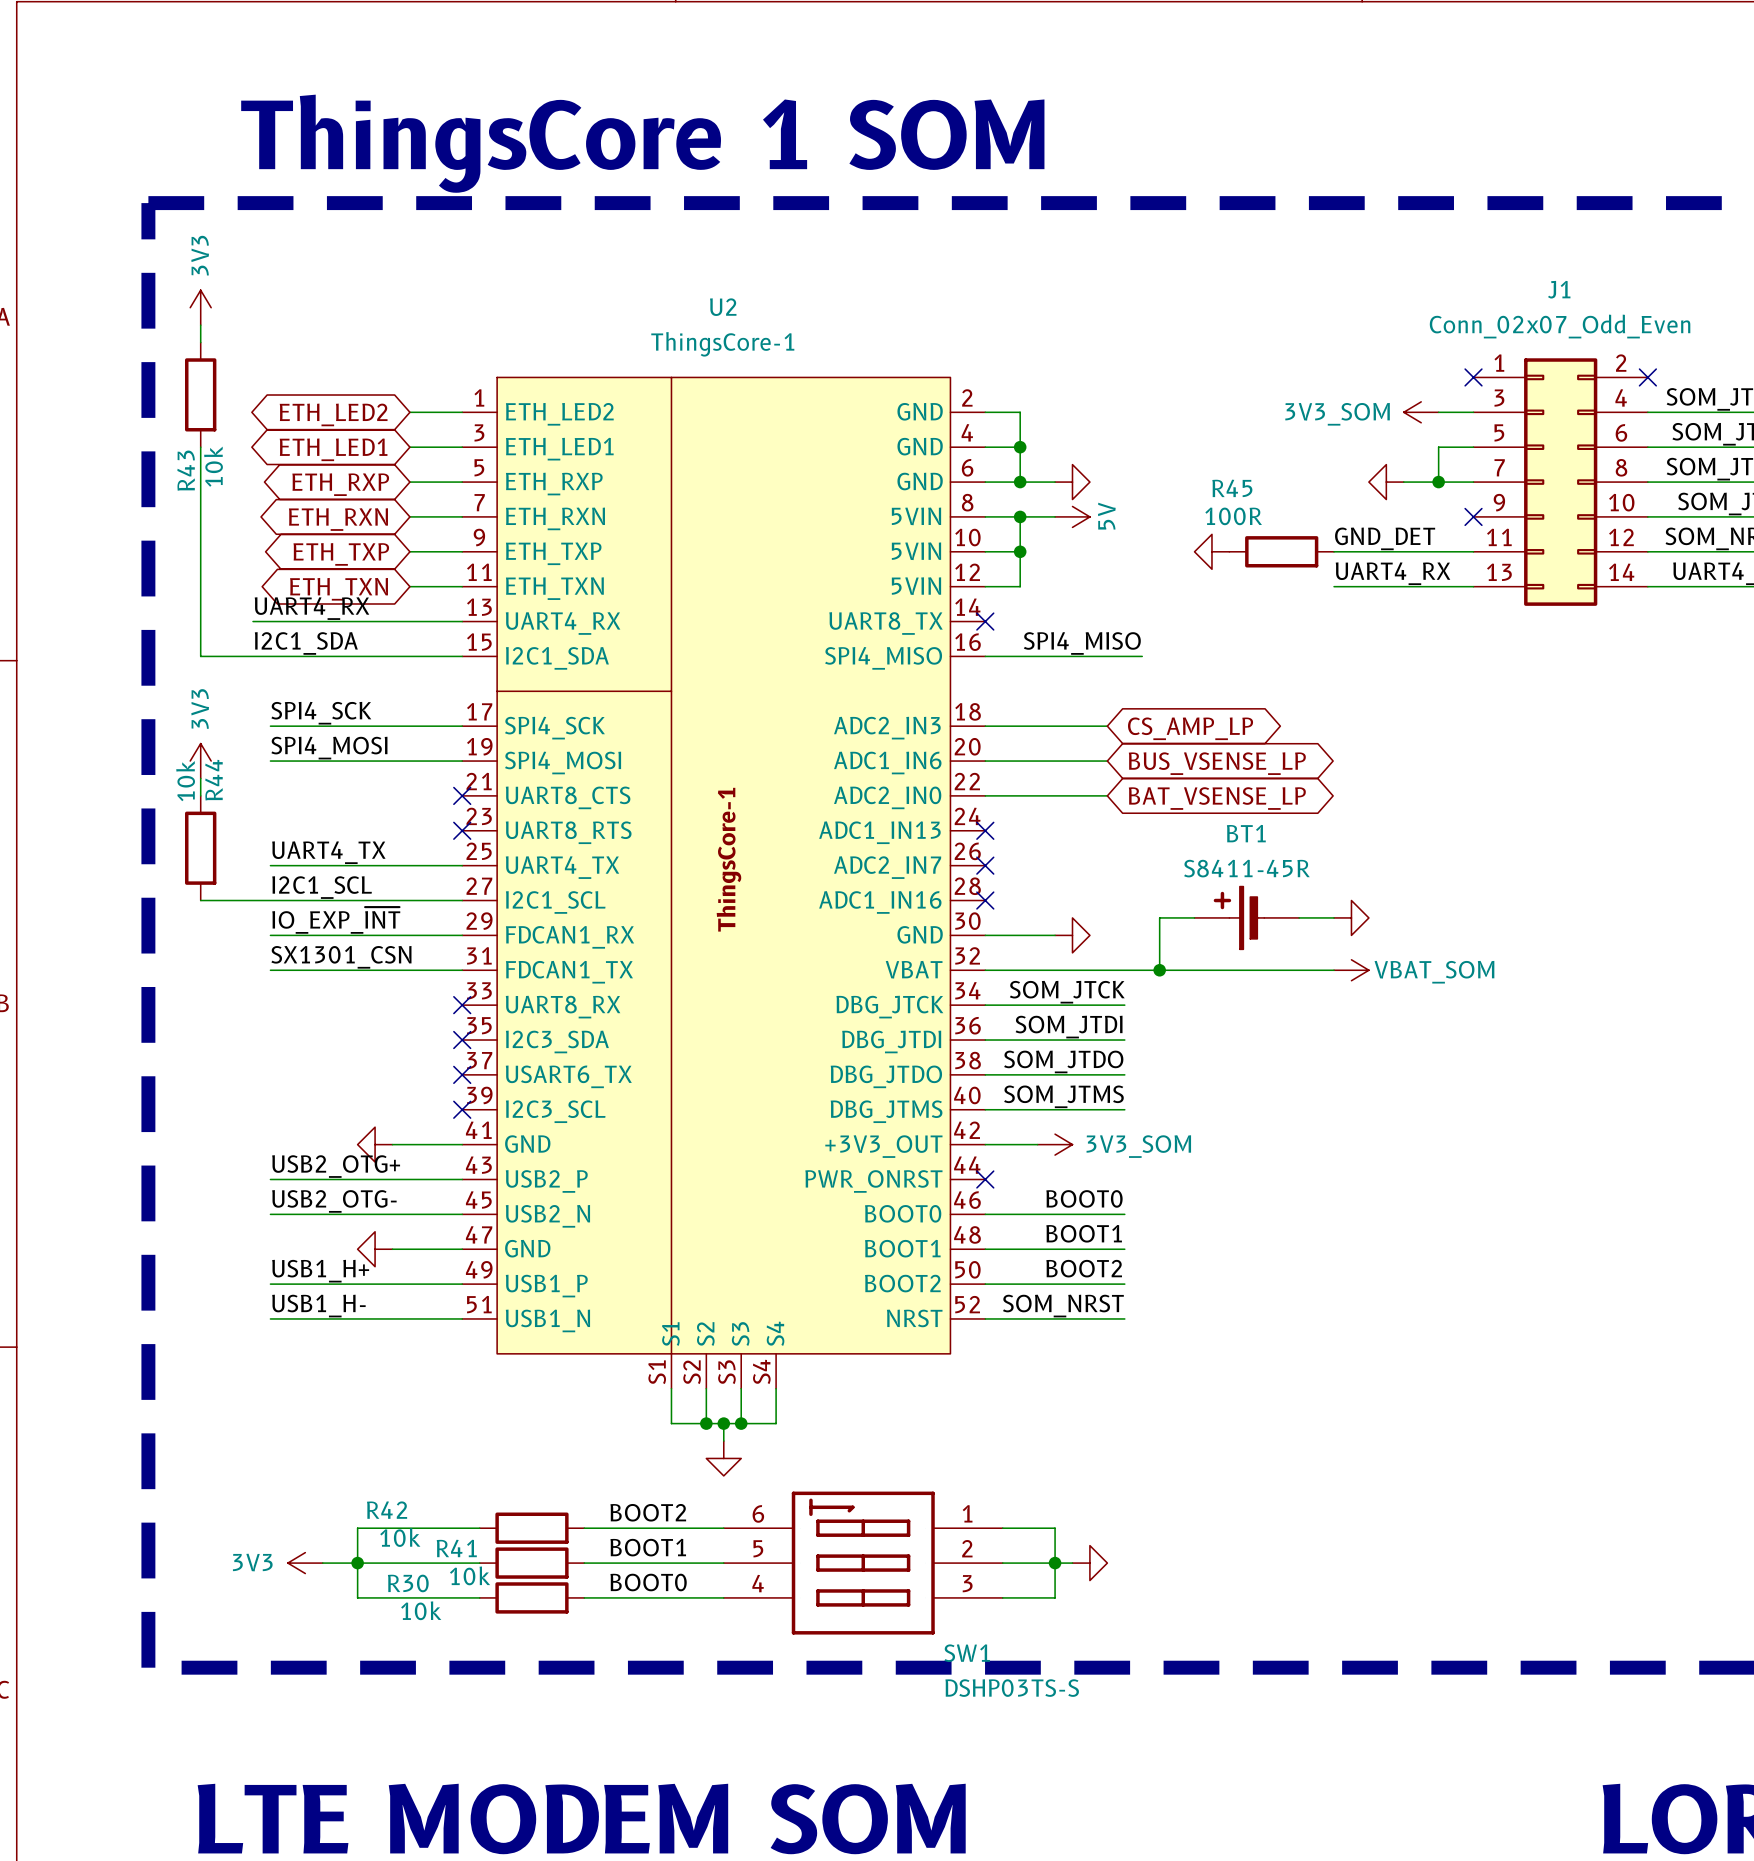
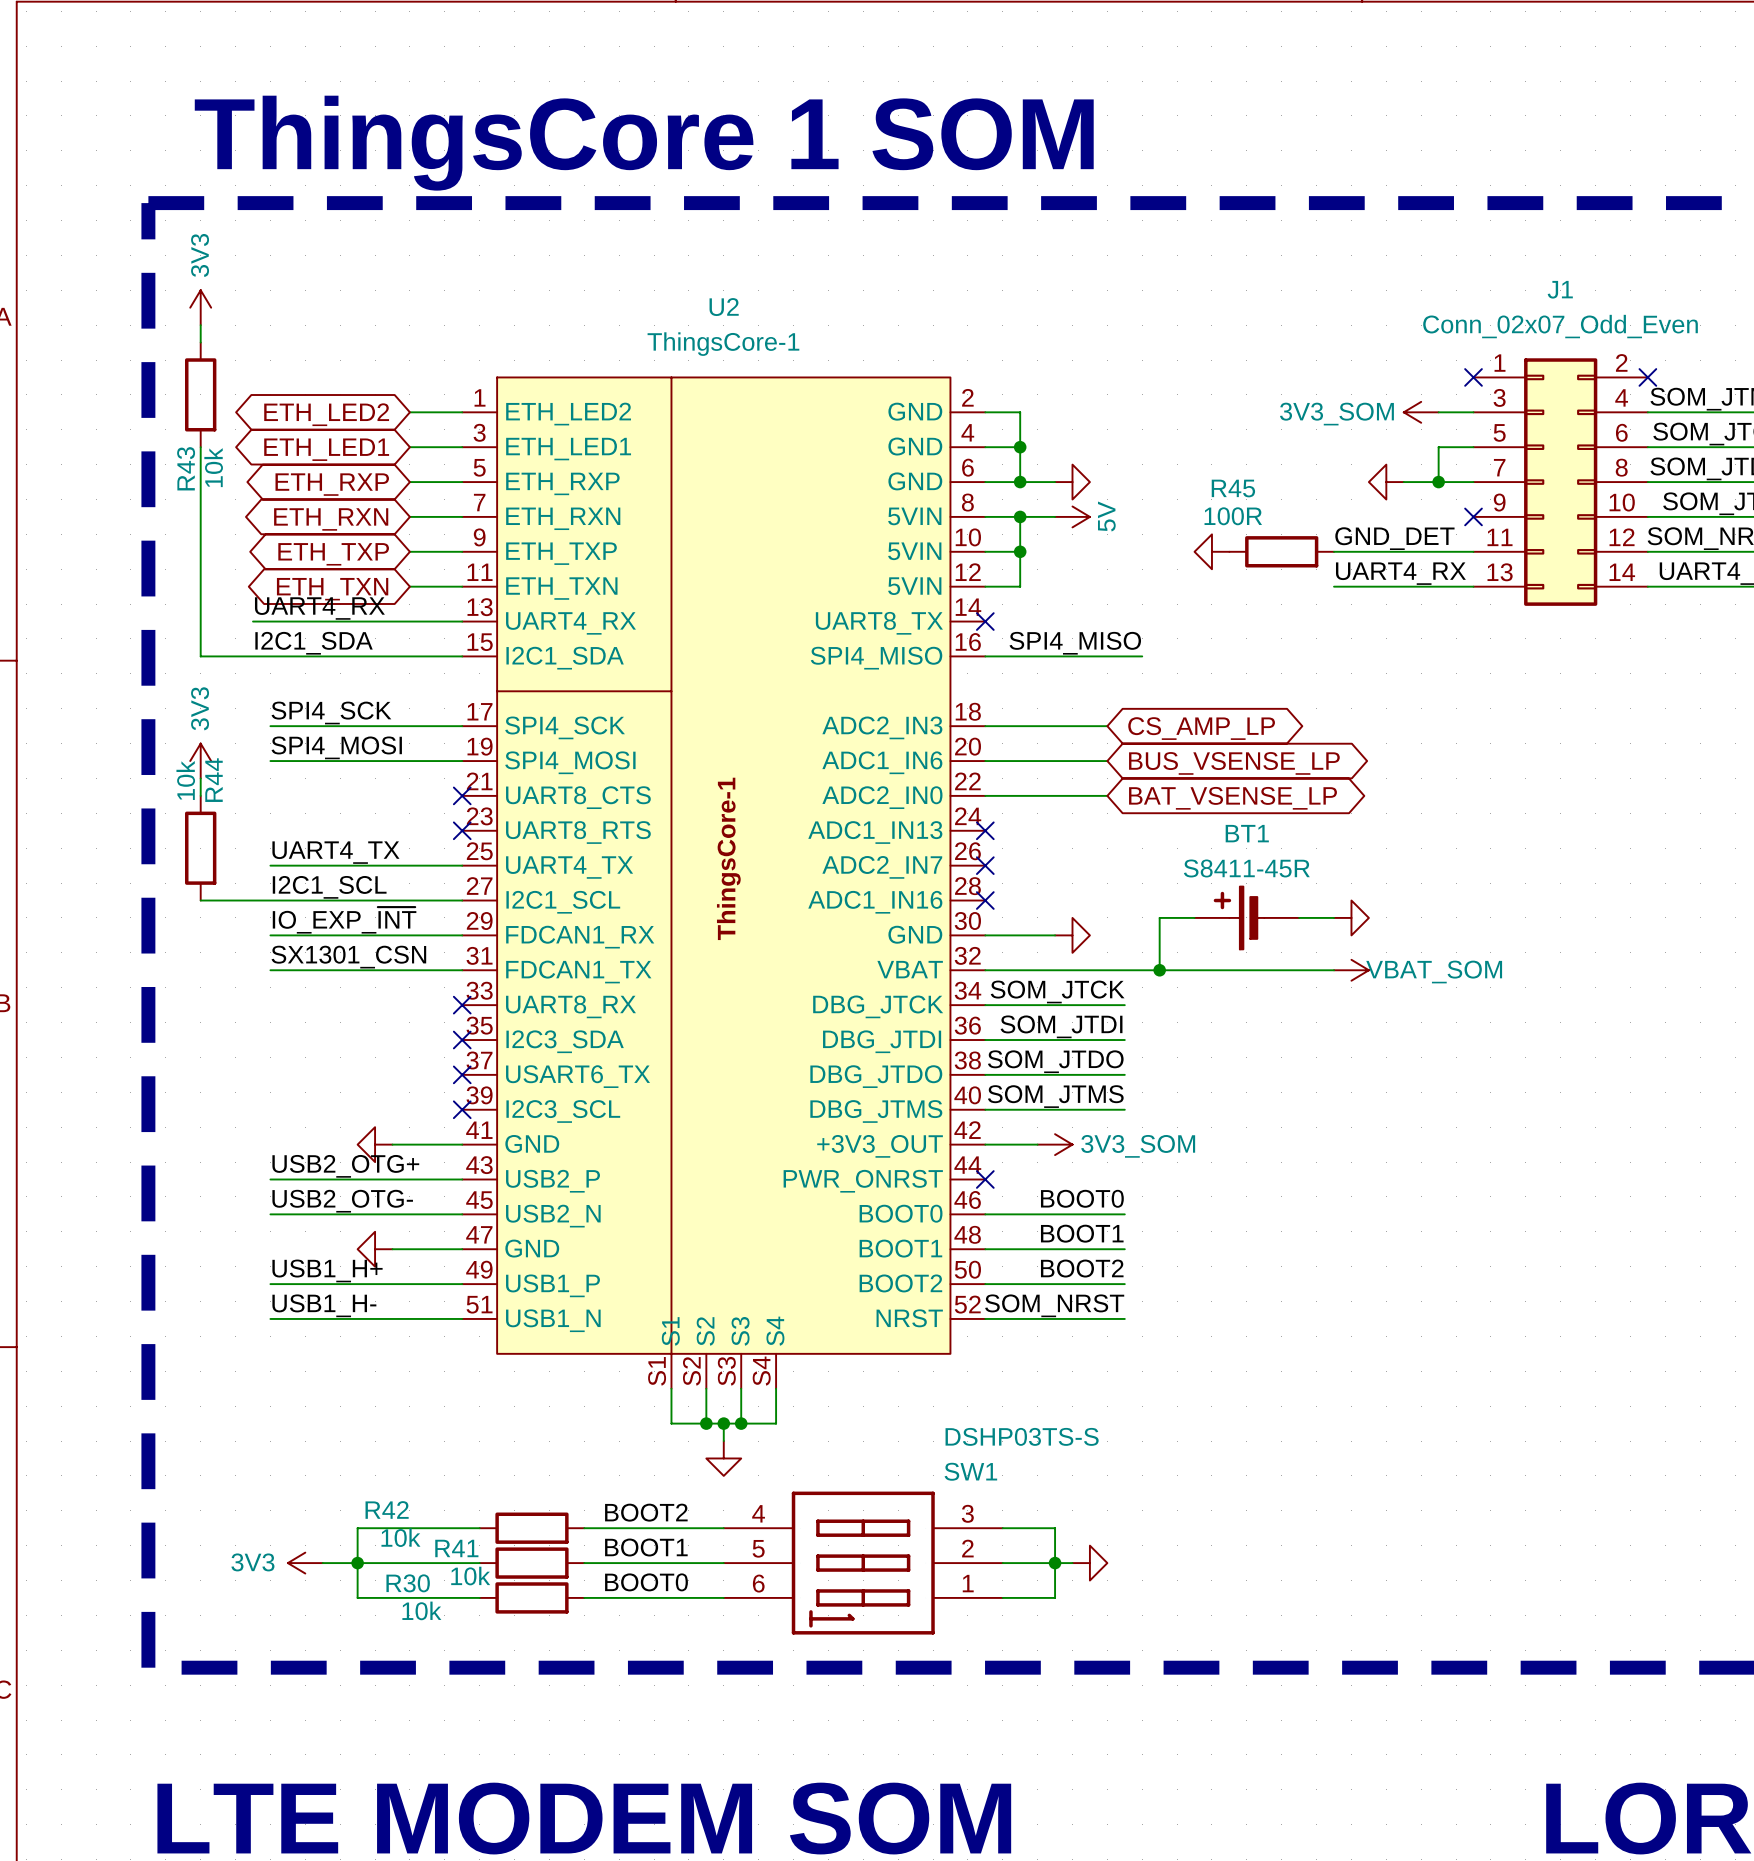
SW1 flip: as is (863, 1563) -> up-down (863, 1563)

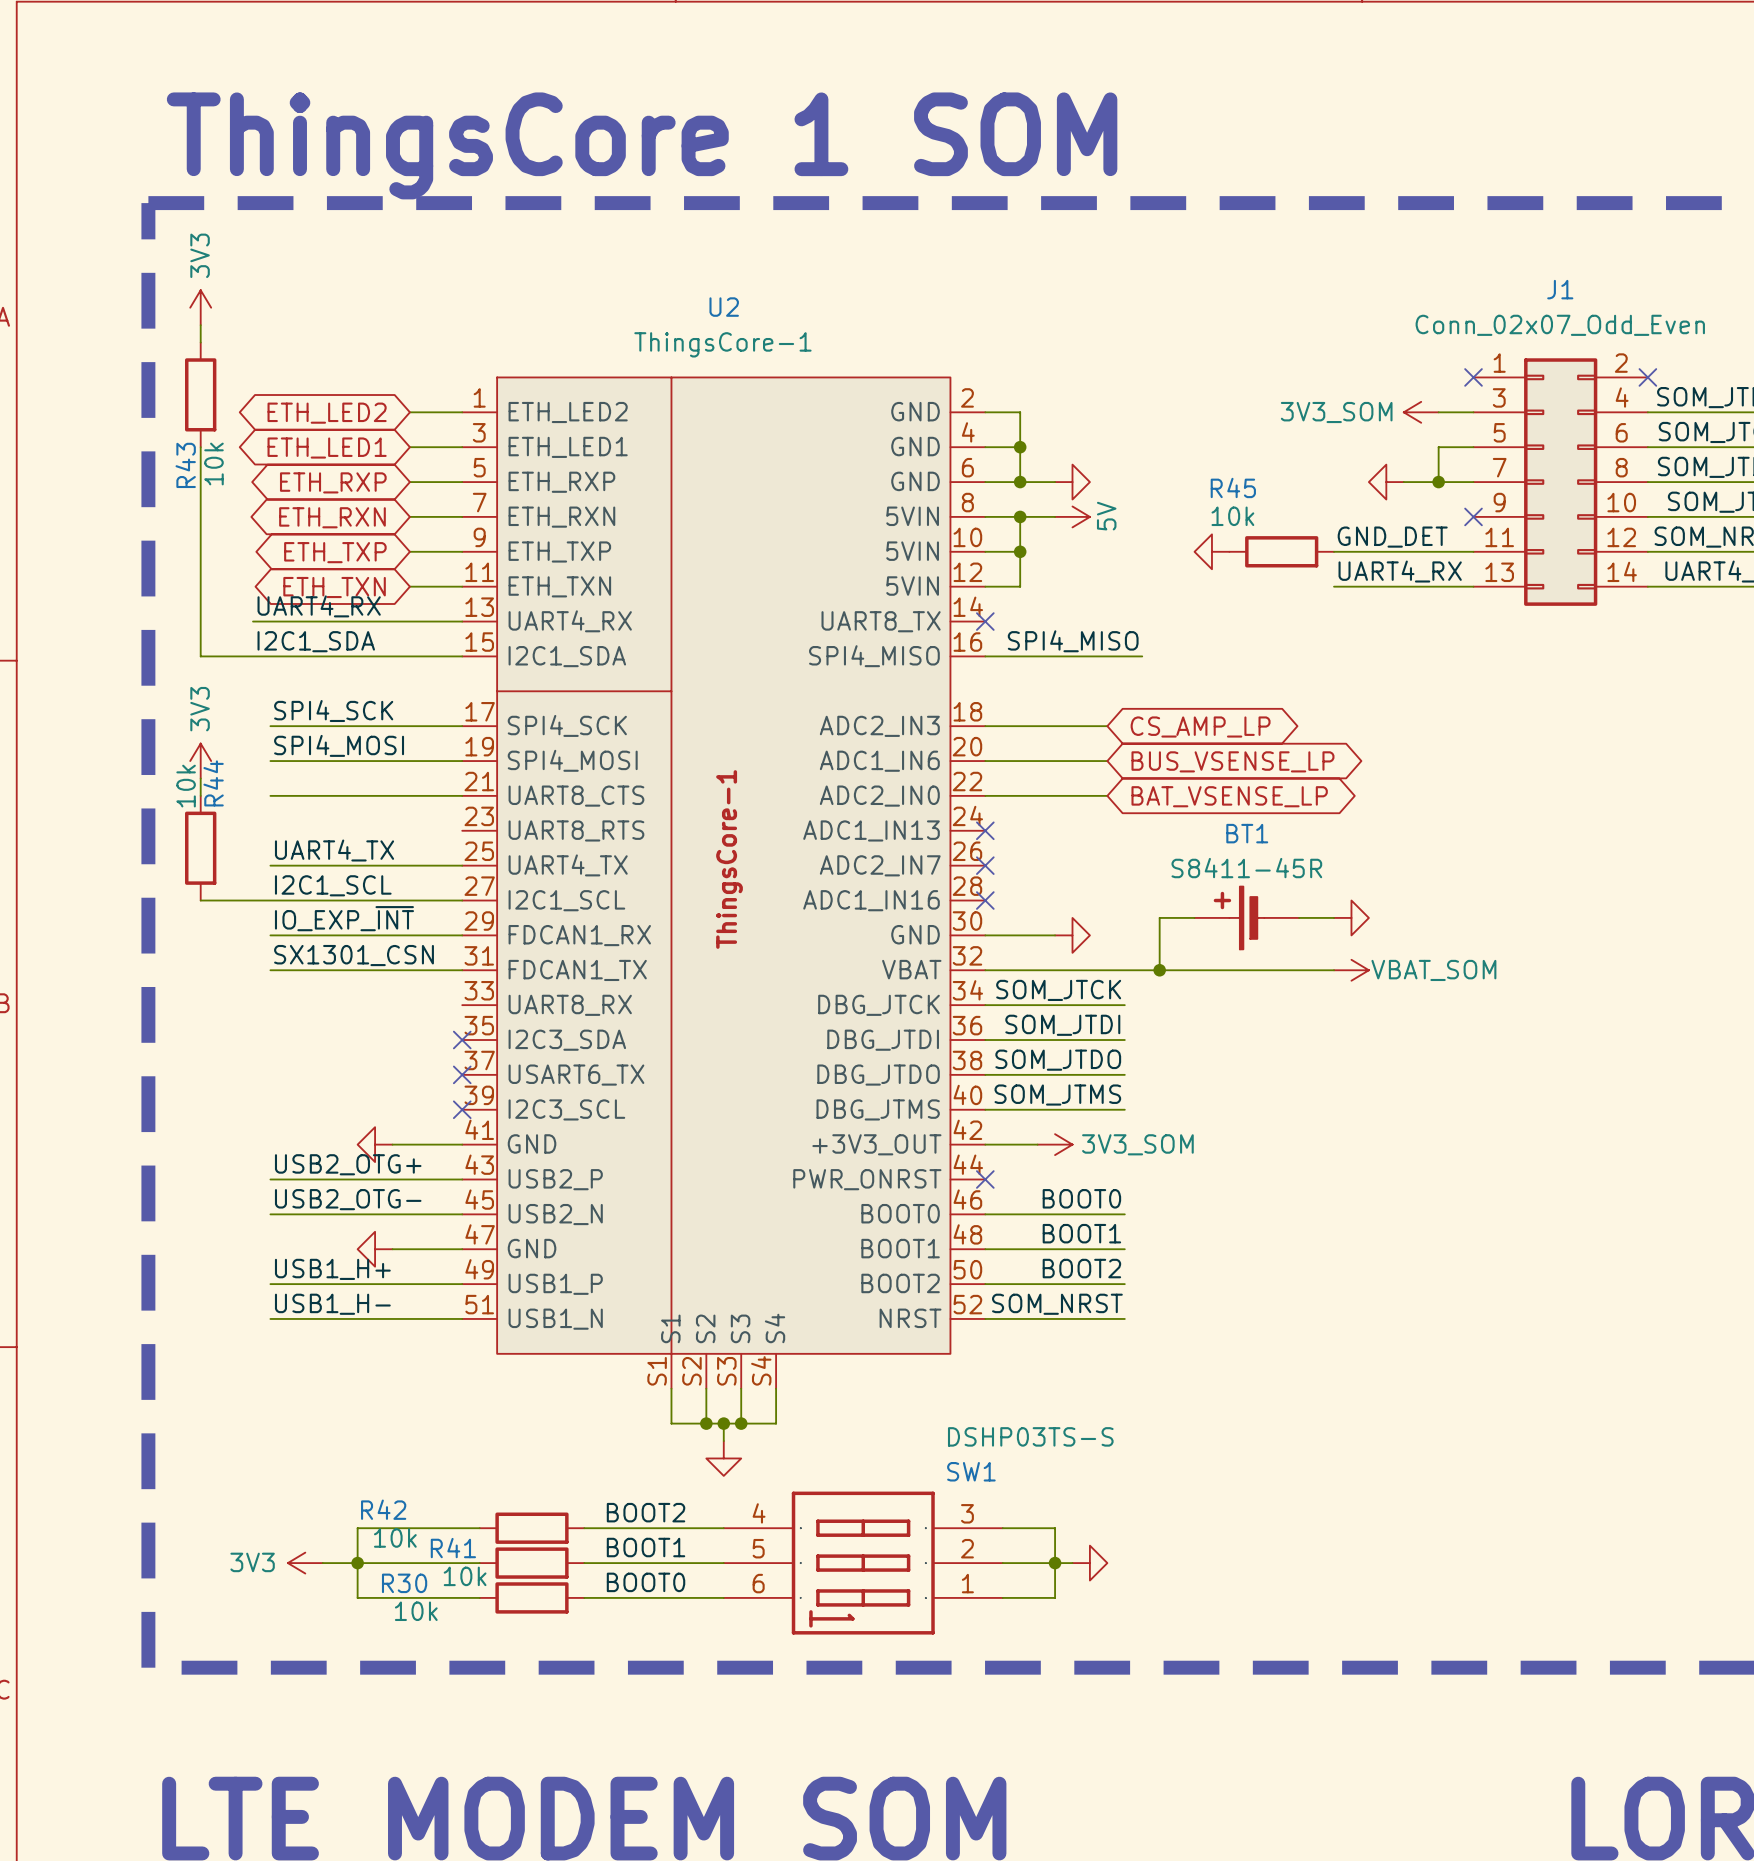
R45 value: 100R (1233, 516) -> 10k (1232, 516)
wire: none -> (270, 795) (462, 795)
no-connect mark: (462, 795) -> none
no-connect mark: (462, 830) -> none
no-connect mark: (462, 1005) -> none

